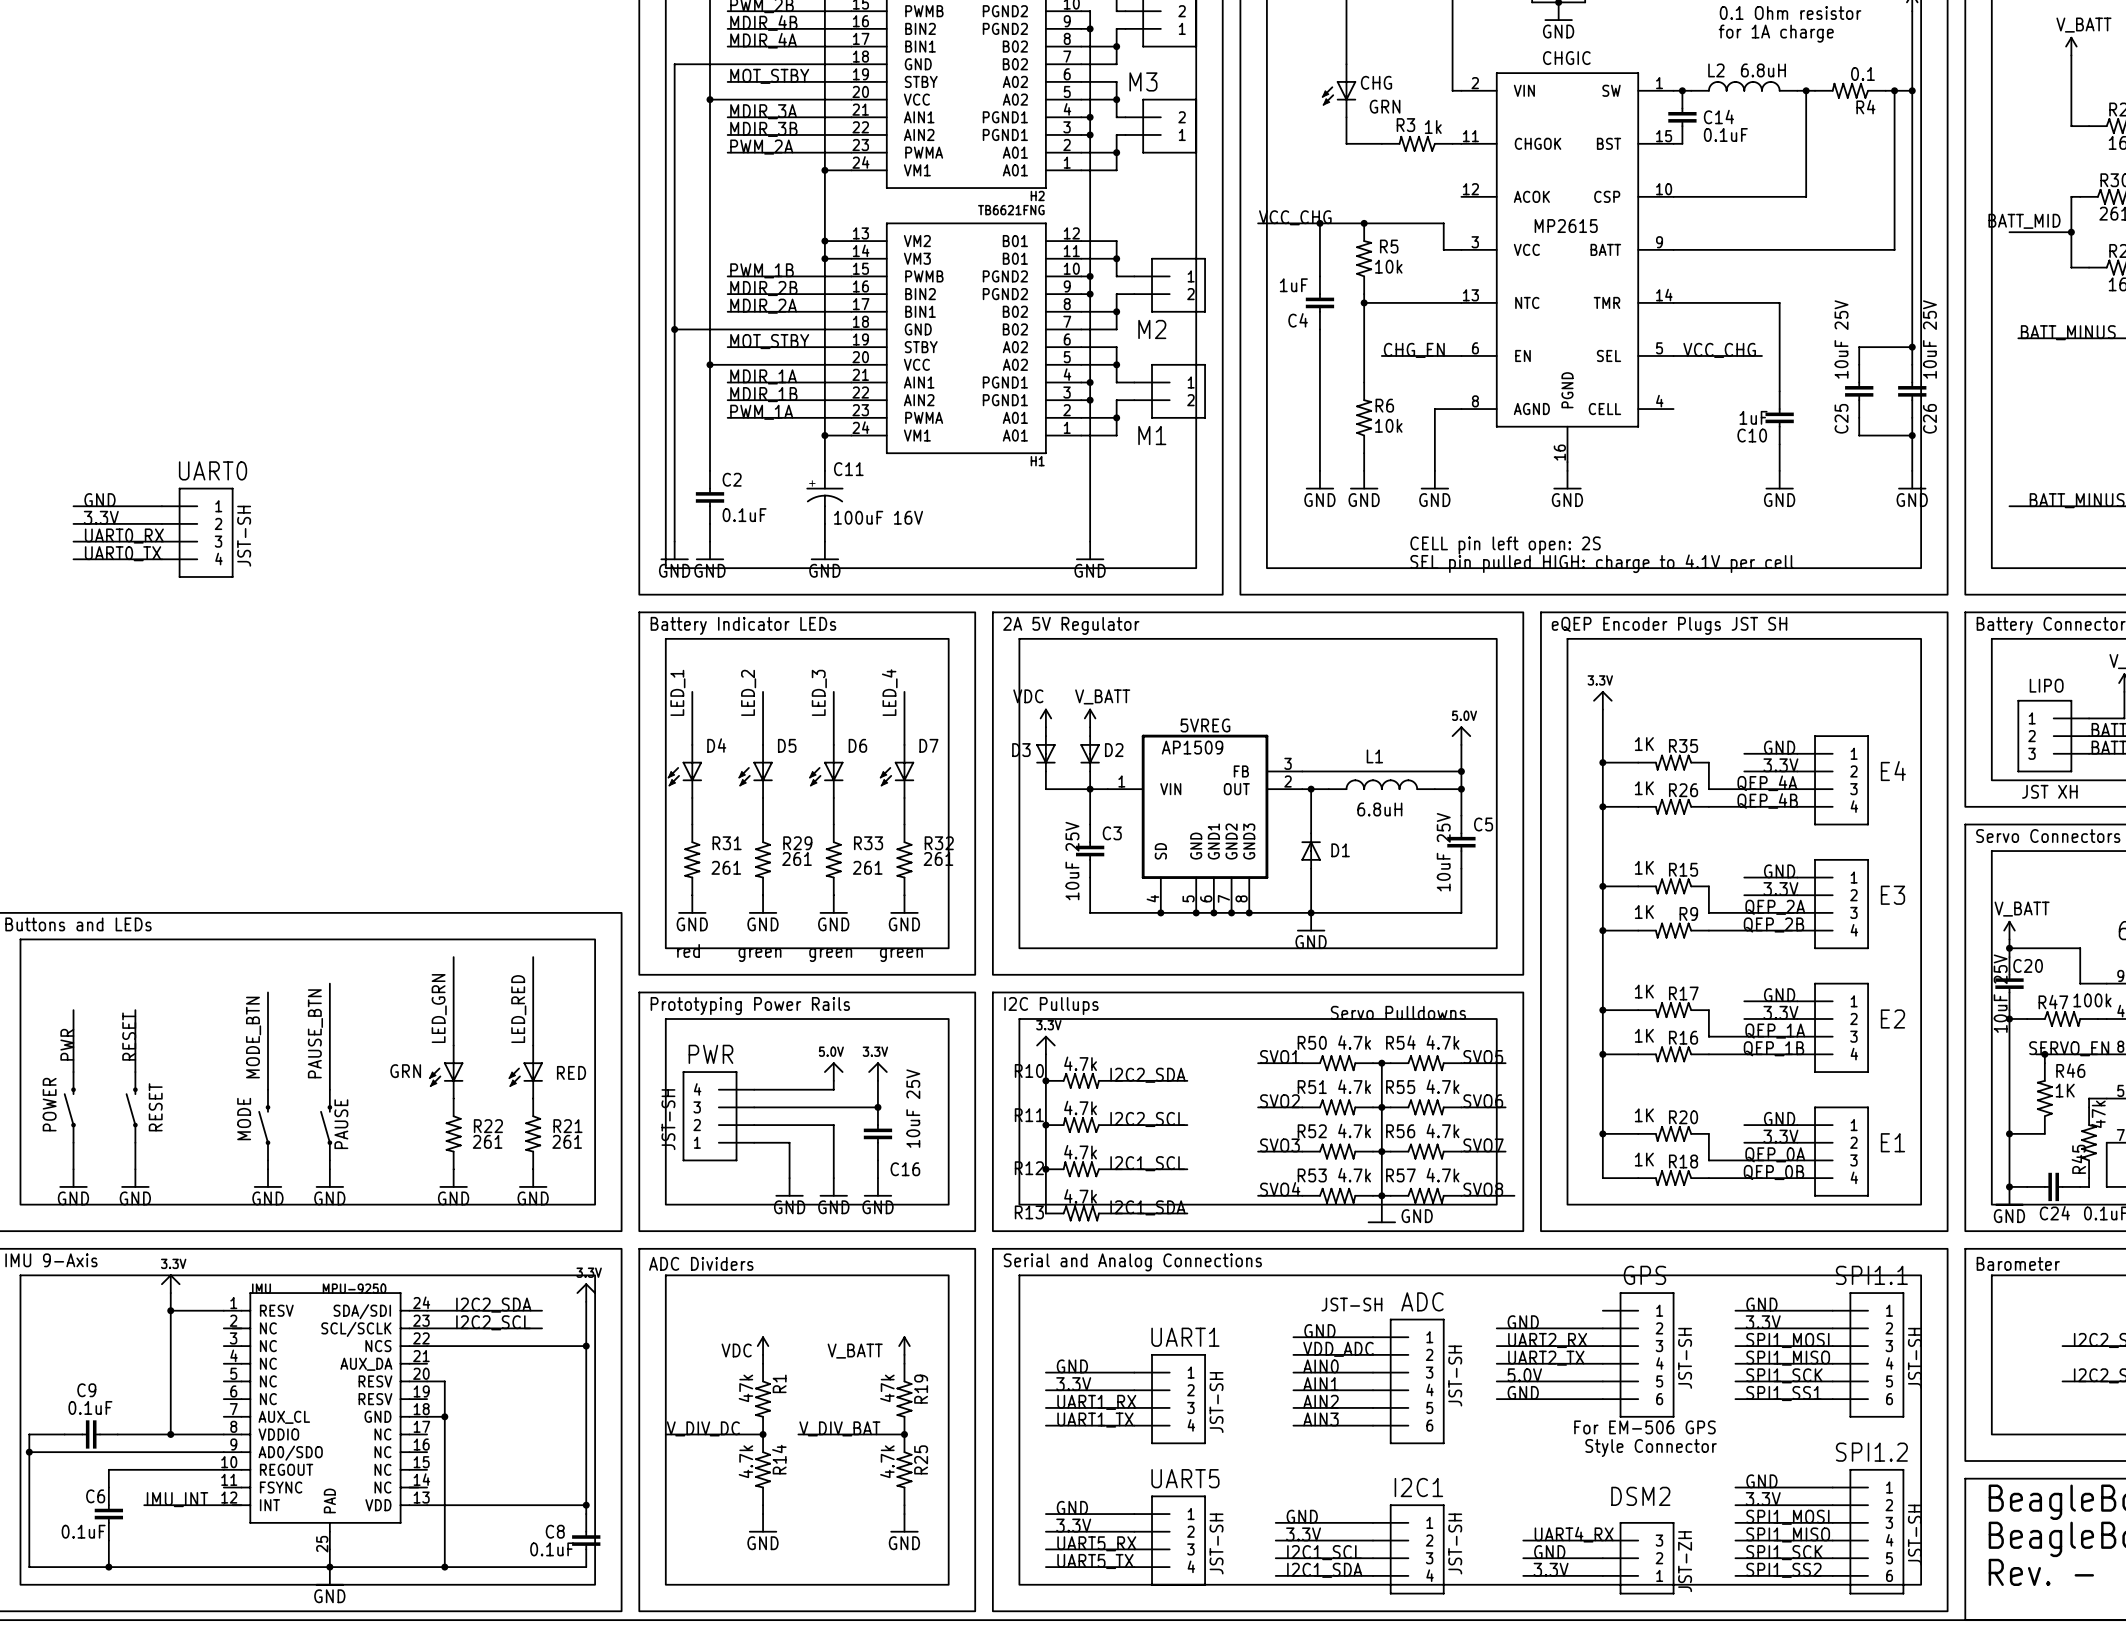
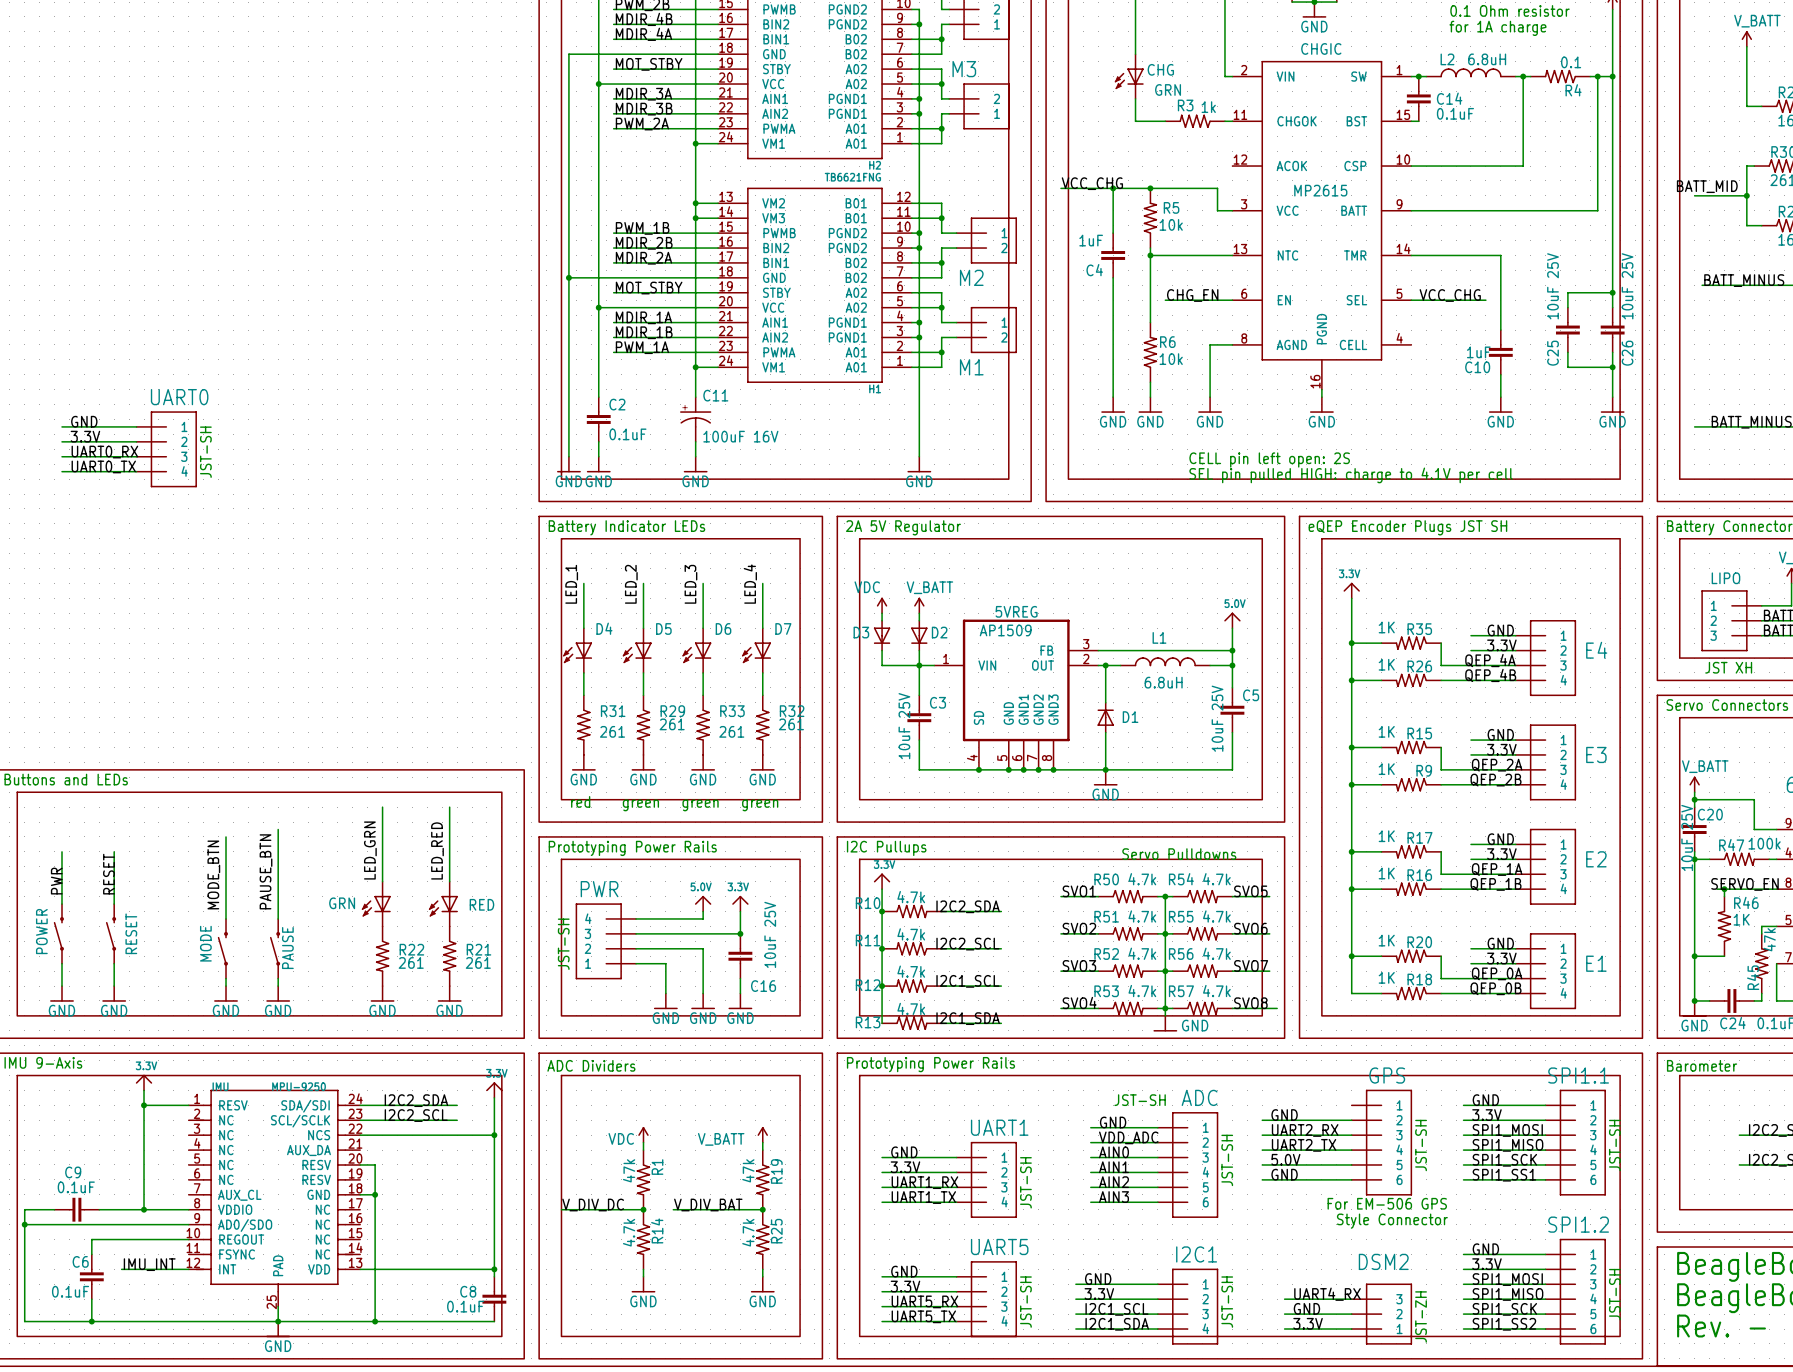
text: Serial and Analog Connections (1132, 1262) -> Prototyping Power Rails (930, 1064)

